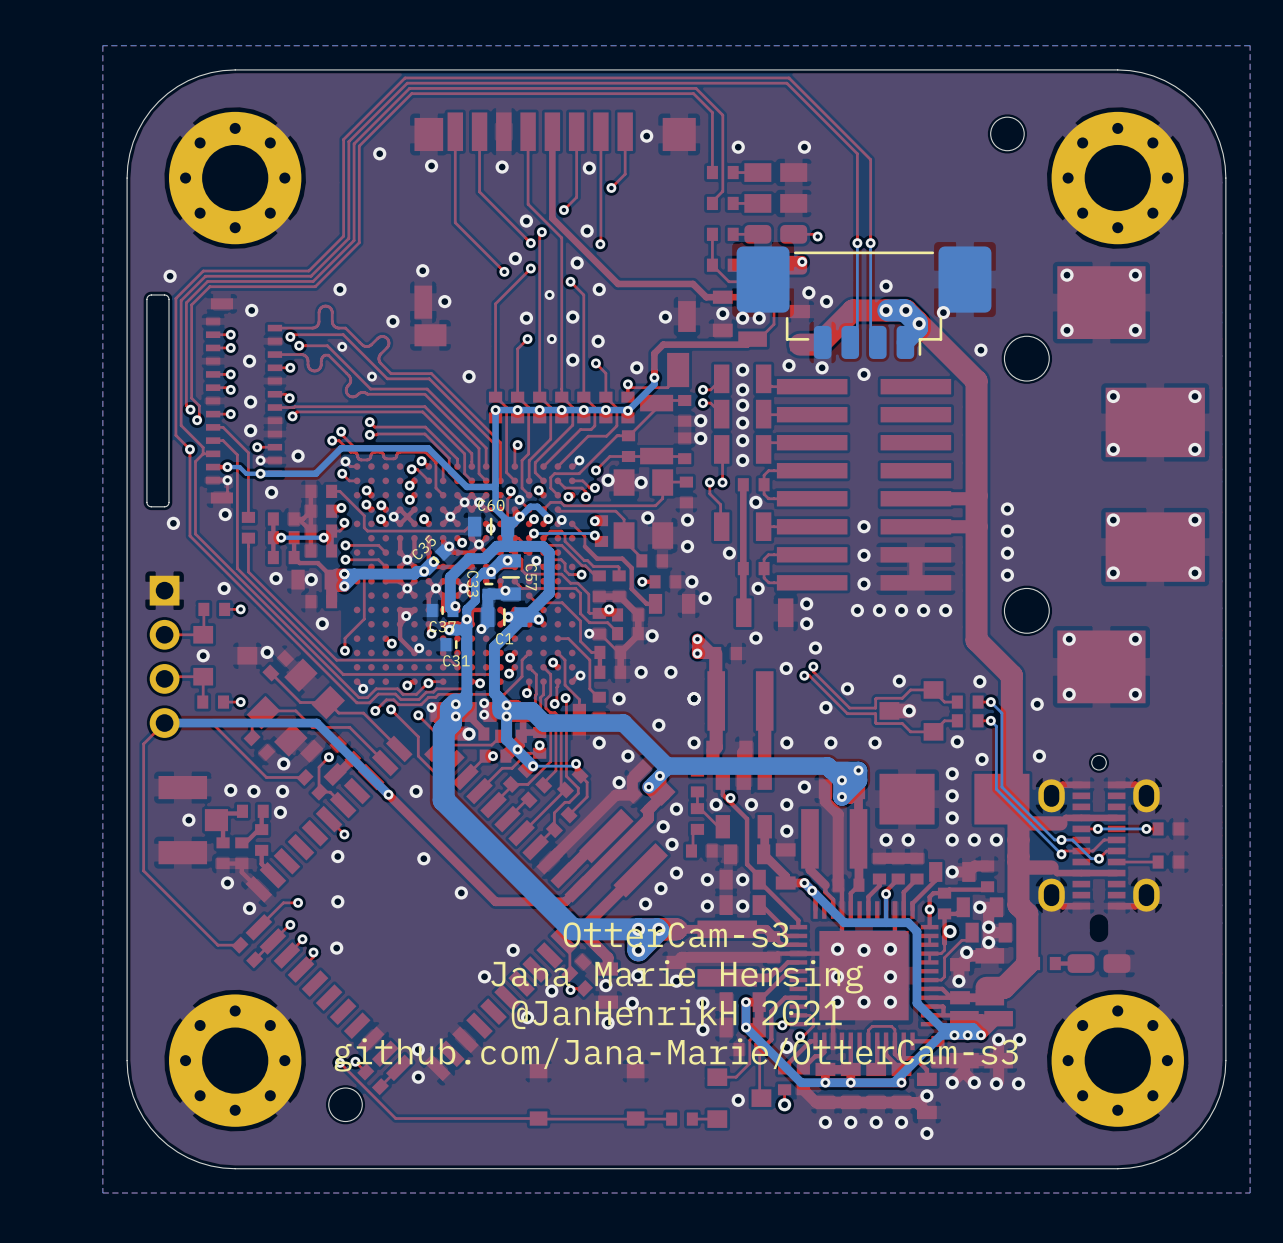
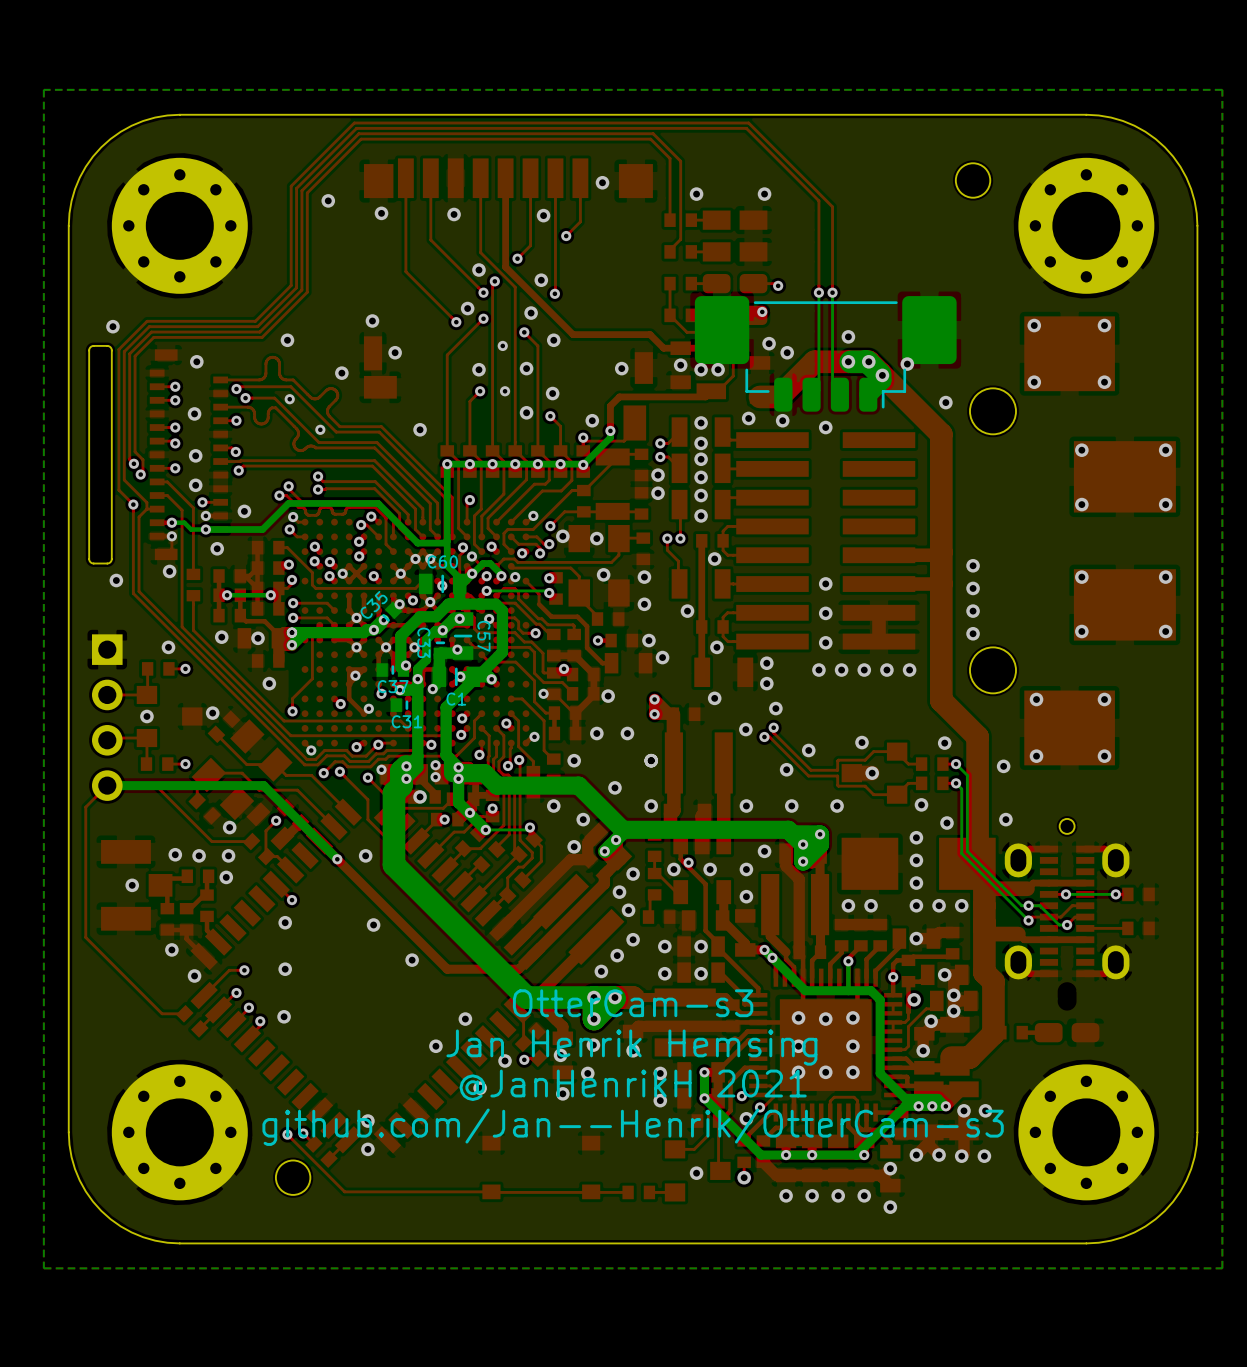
text: Jana Marie Hemsing (677, 976) -> Jan Henrik Hemsing (631, 1047)
text: github.com/Jana-Marie/OtterCam-s3 (676, 1054) -> github.com/Jan--Henrik/OtterCam-s3 (633, 1127)

